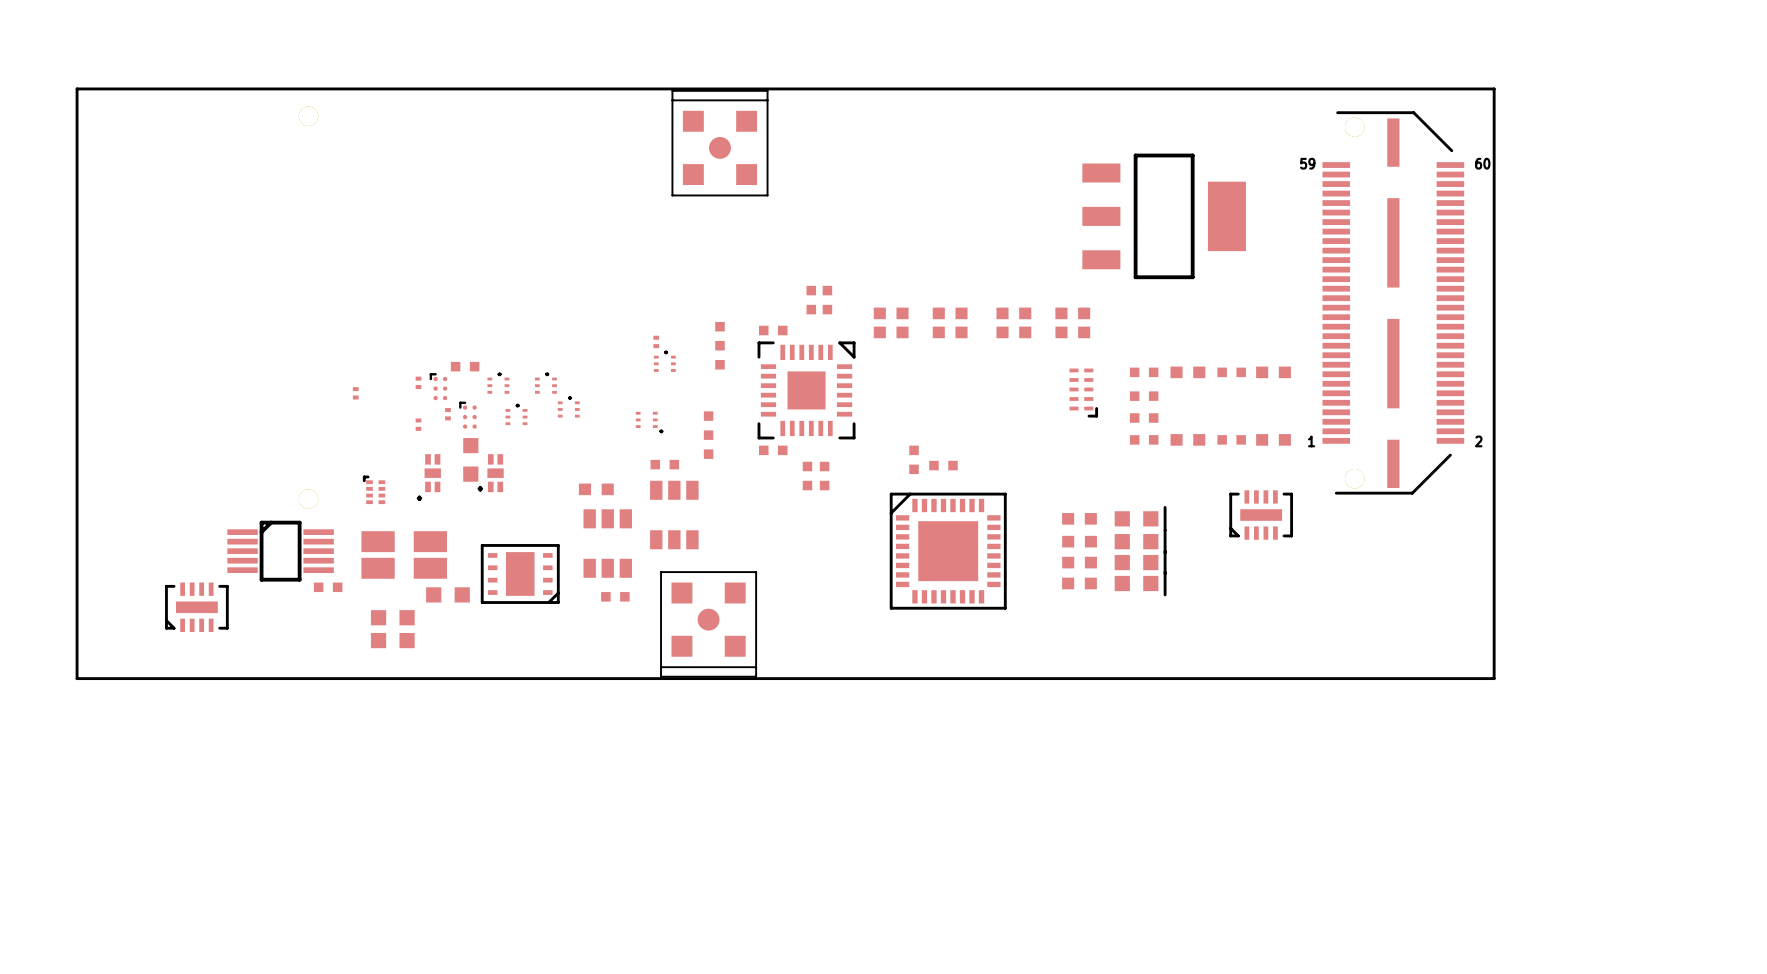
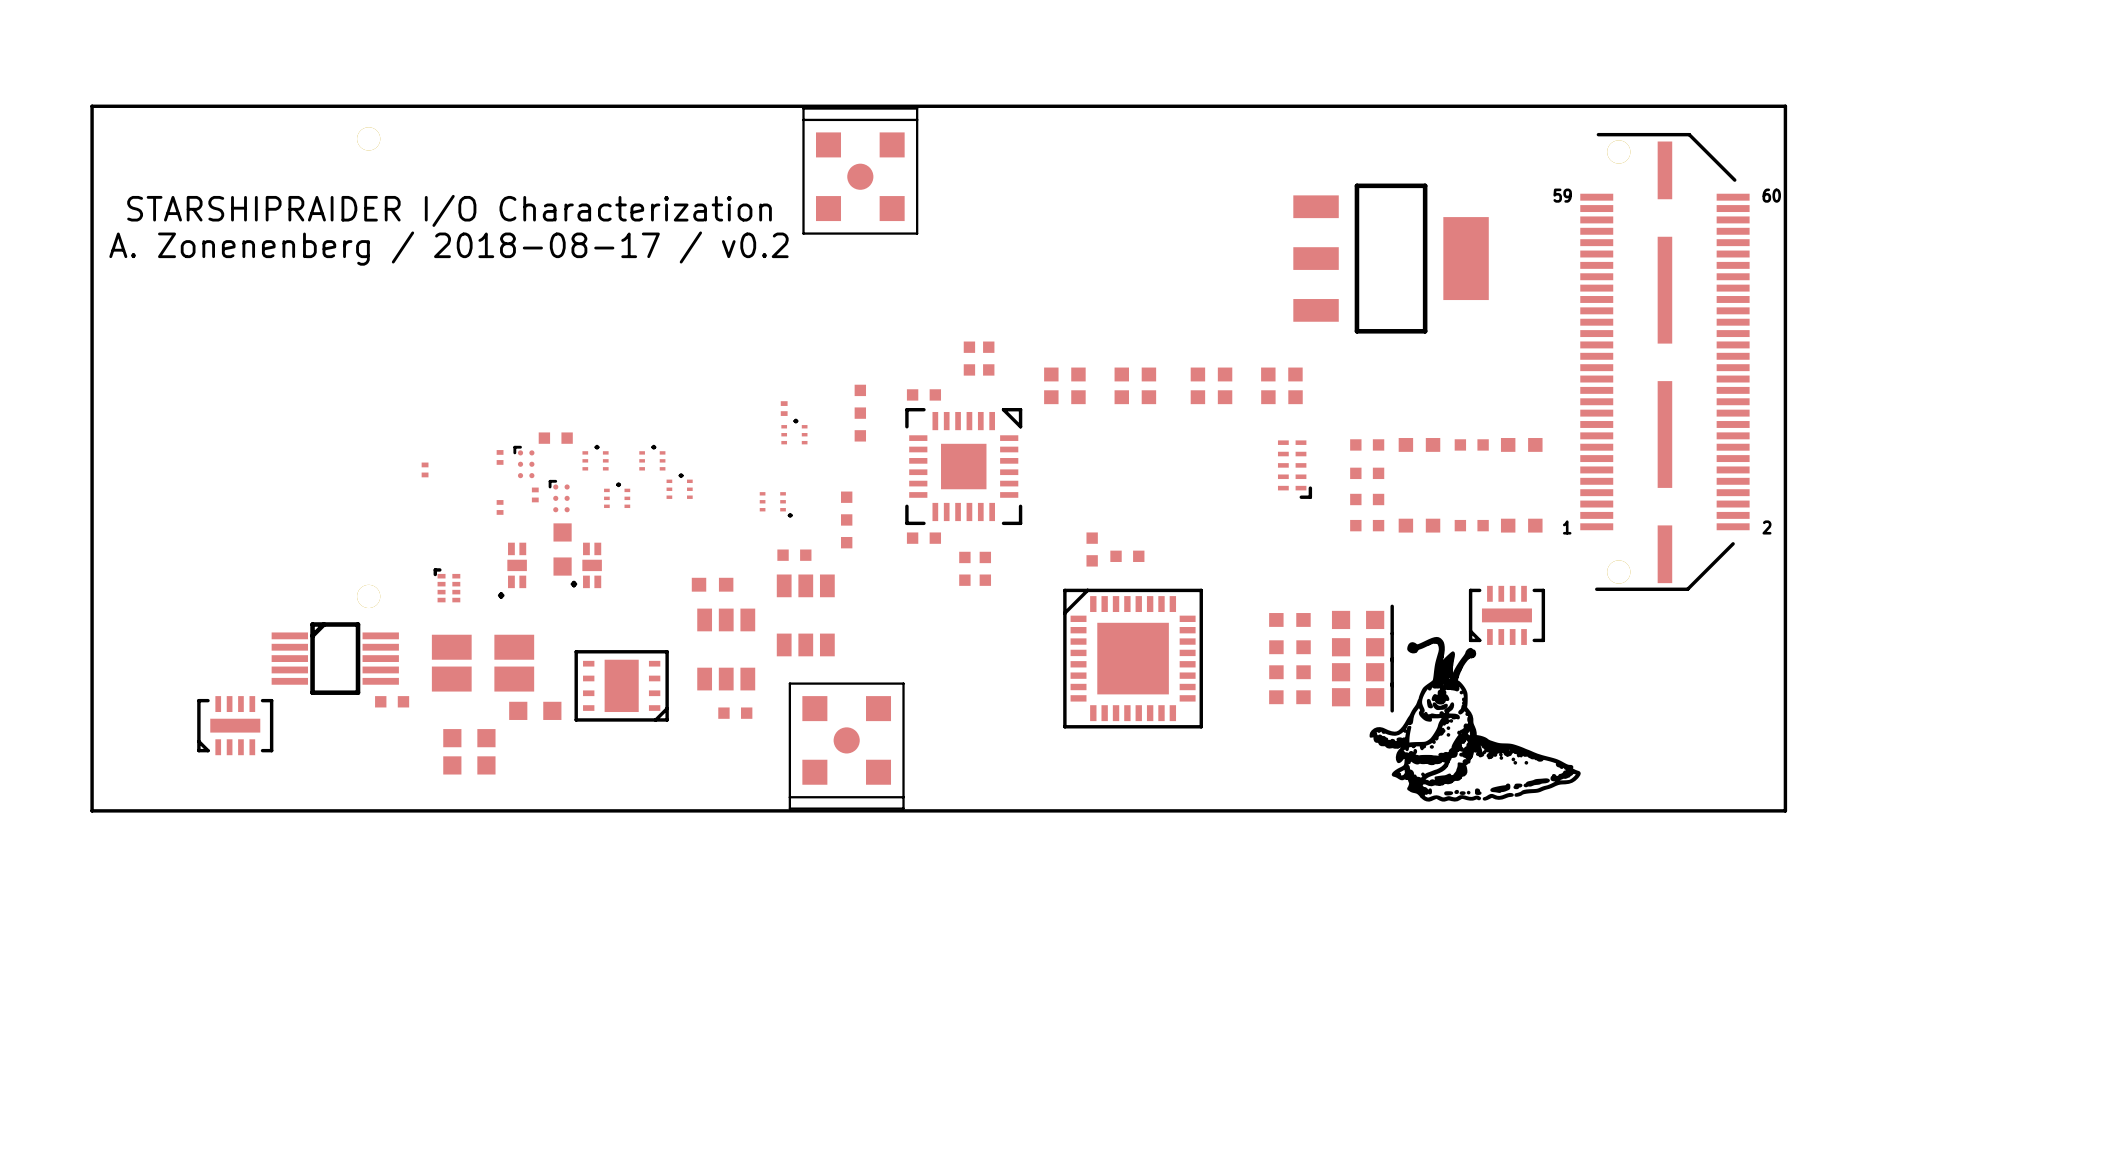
text: none -> STARSHIPRAIDER I/O Characterization (449, 210)
text: none -> A. Zonenenberg / 2018-08-17 / v0.2 (448, 248)
drawing: none -> [1369, 636, 1581, 802]

